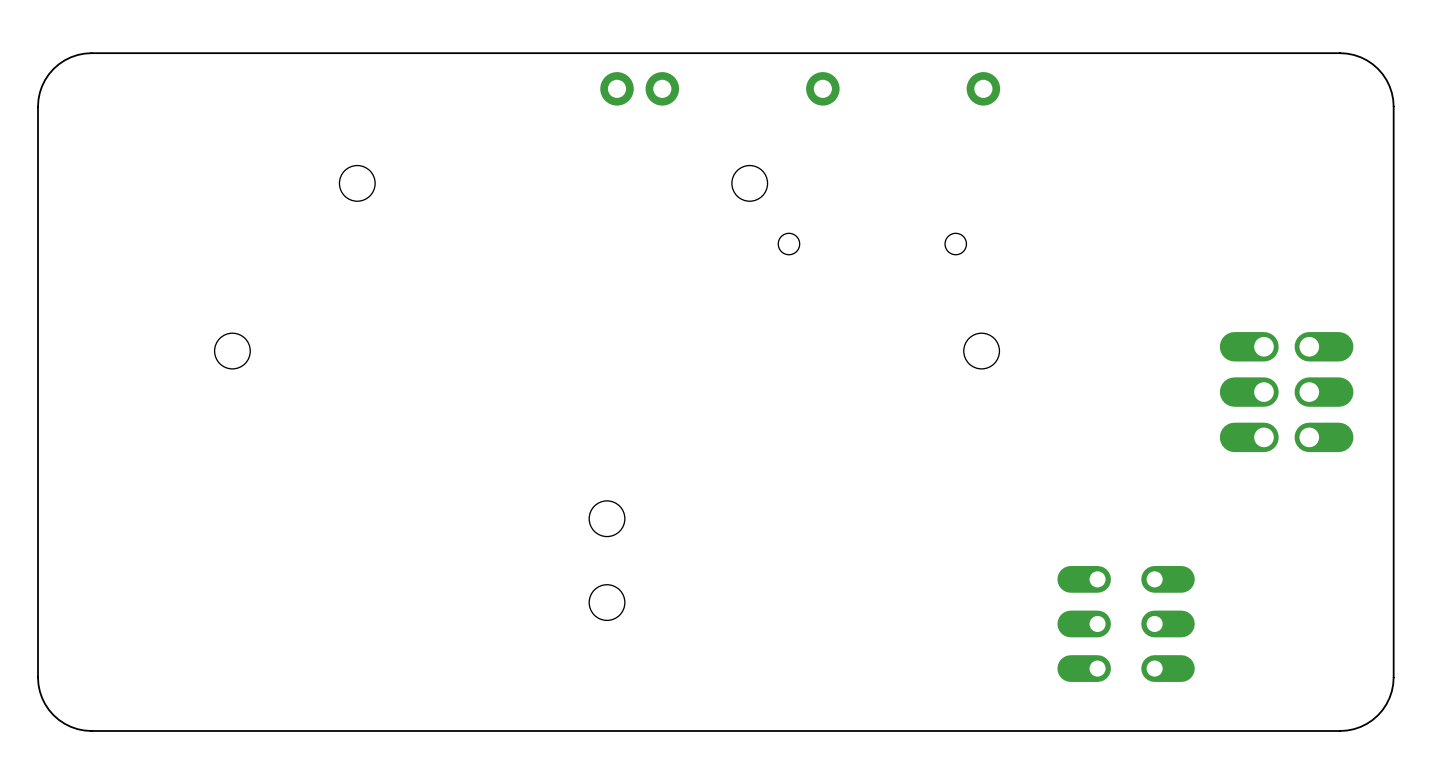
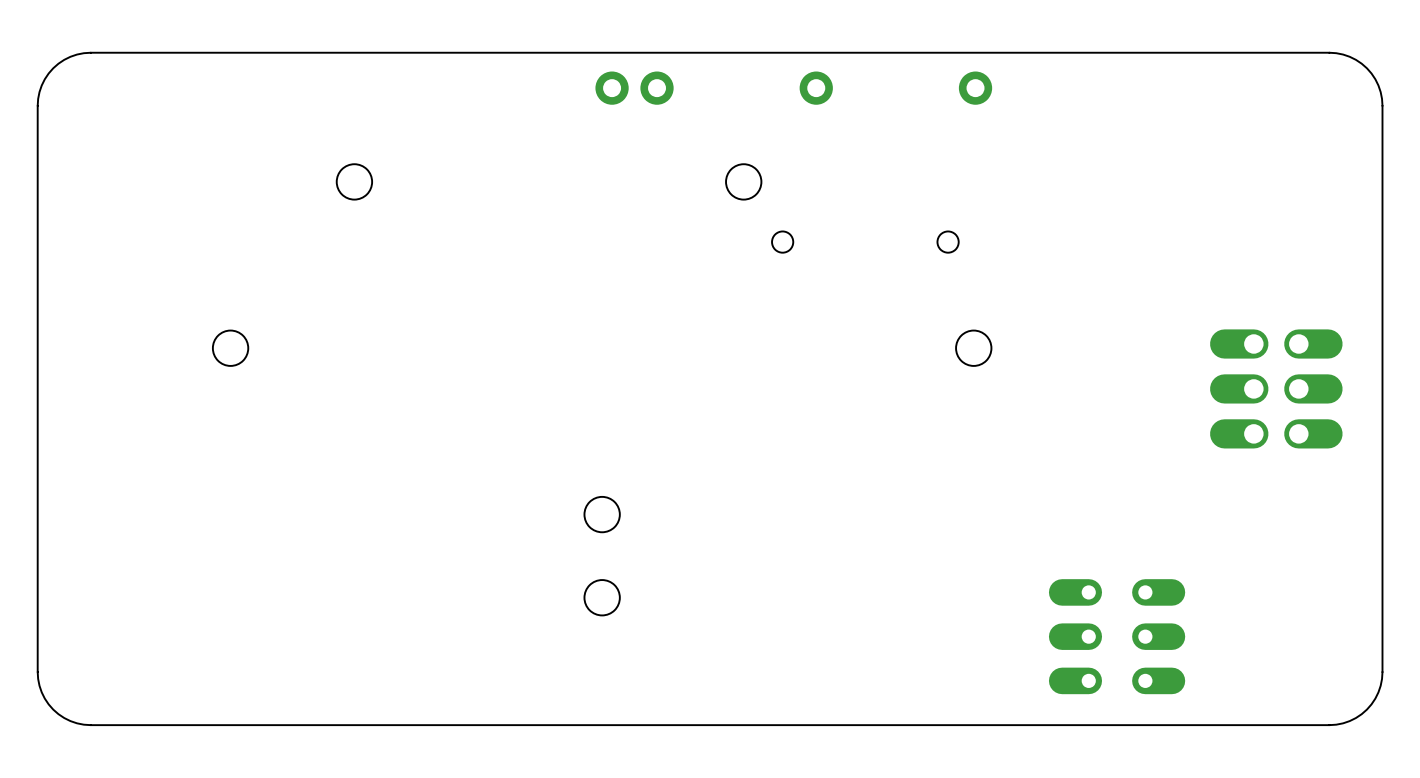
part footprint: [1057, 565, 1195, 682] -> [1048, 579, 1186, 695]

